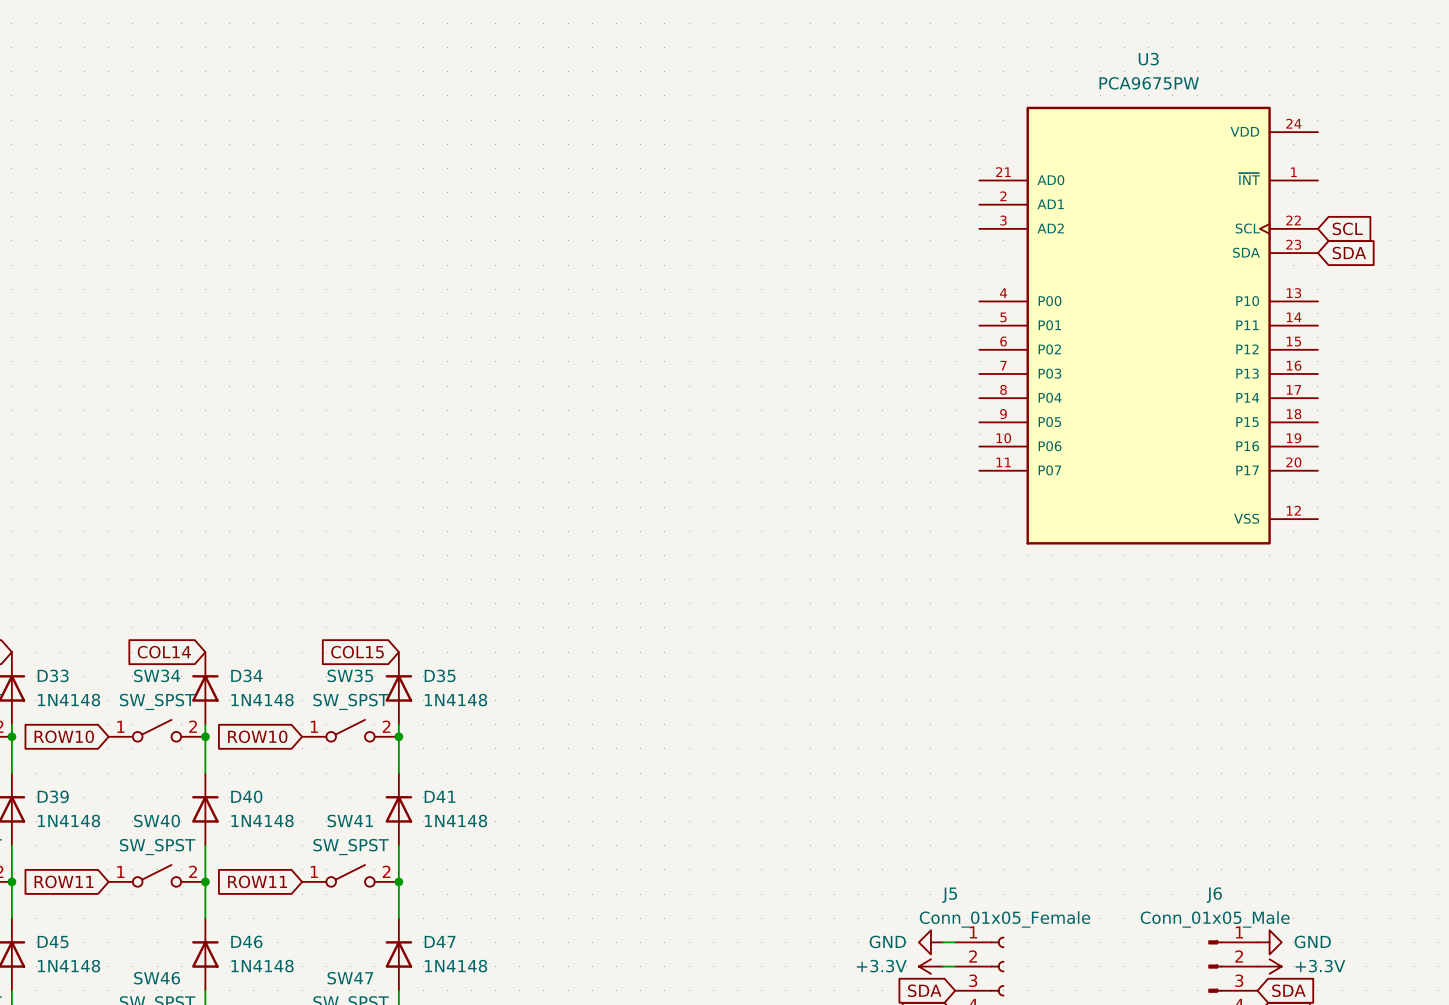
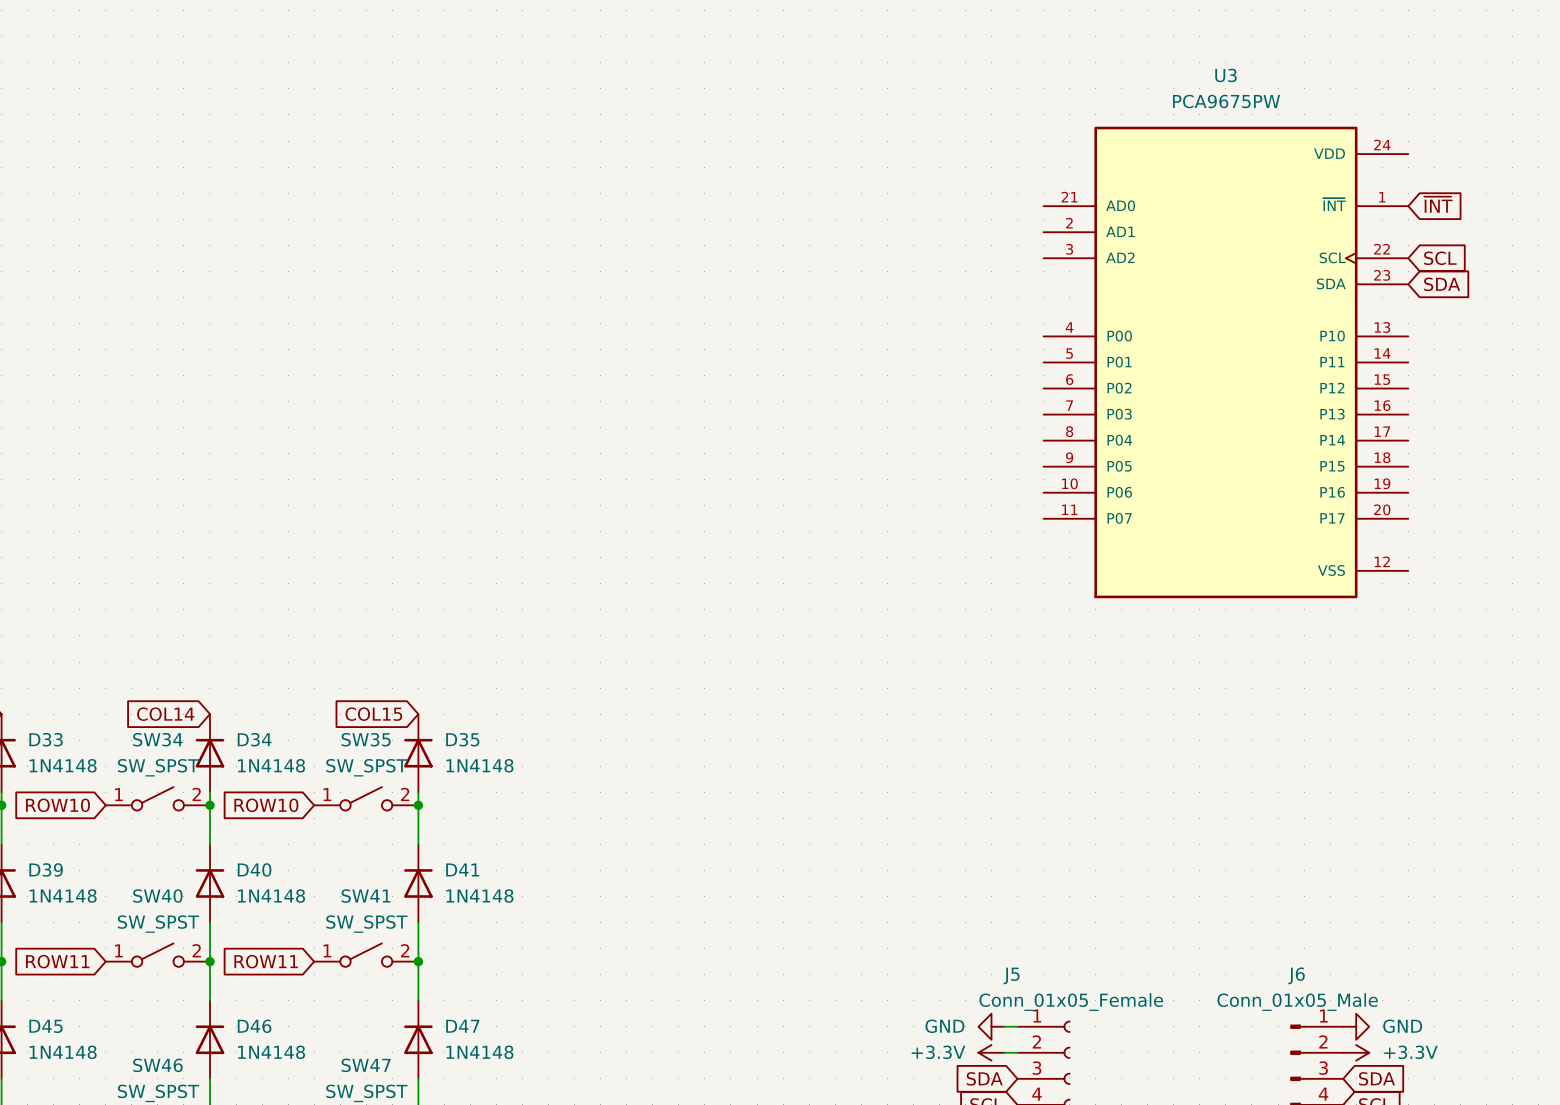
global label: none -> ~{INT} (1438, 204)

